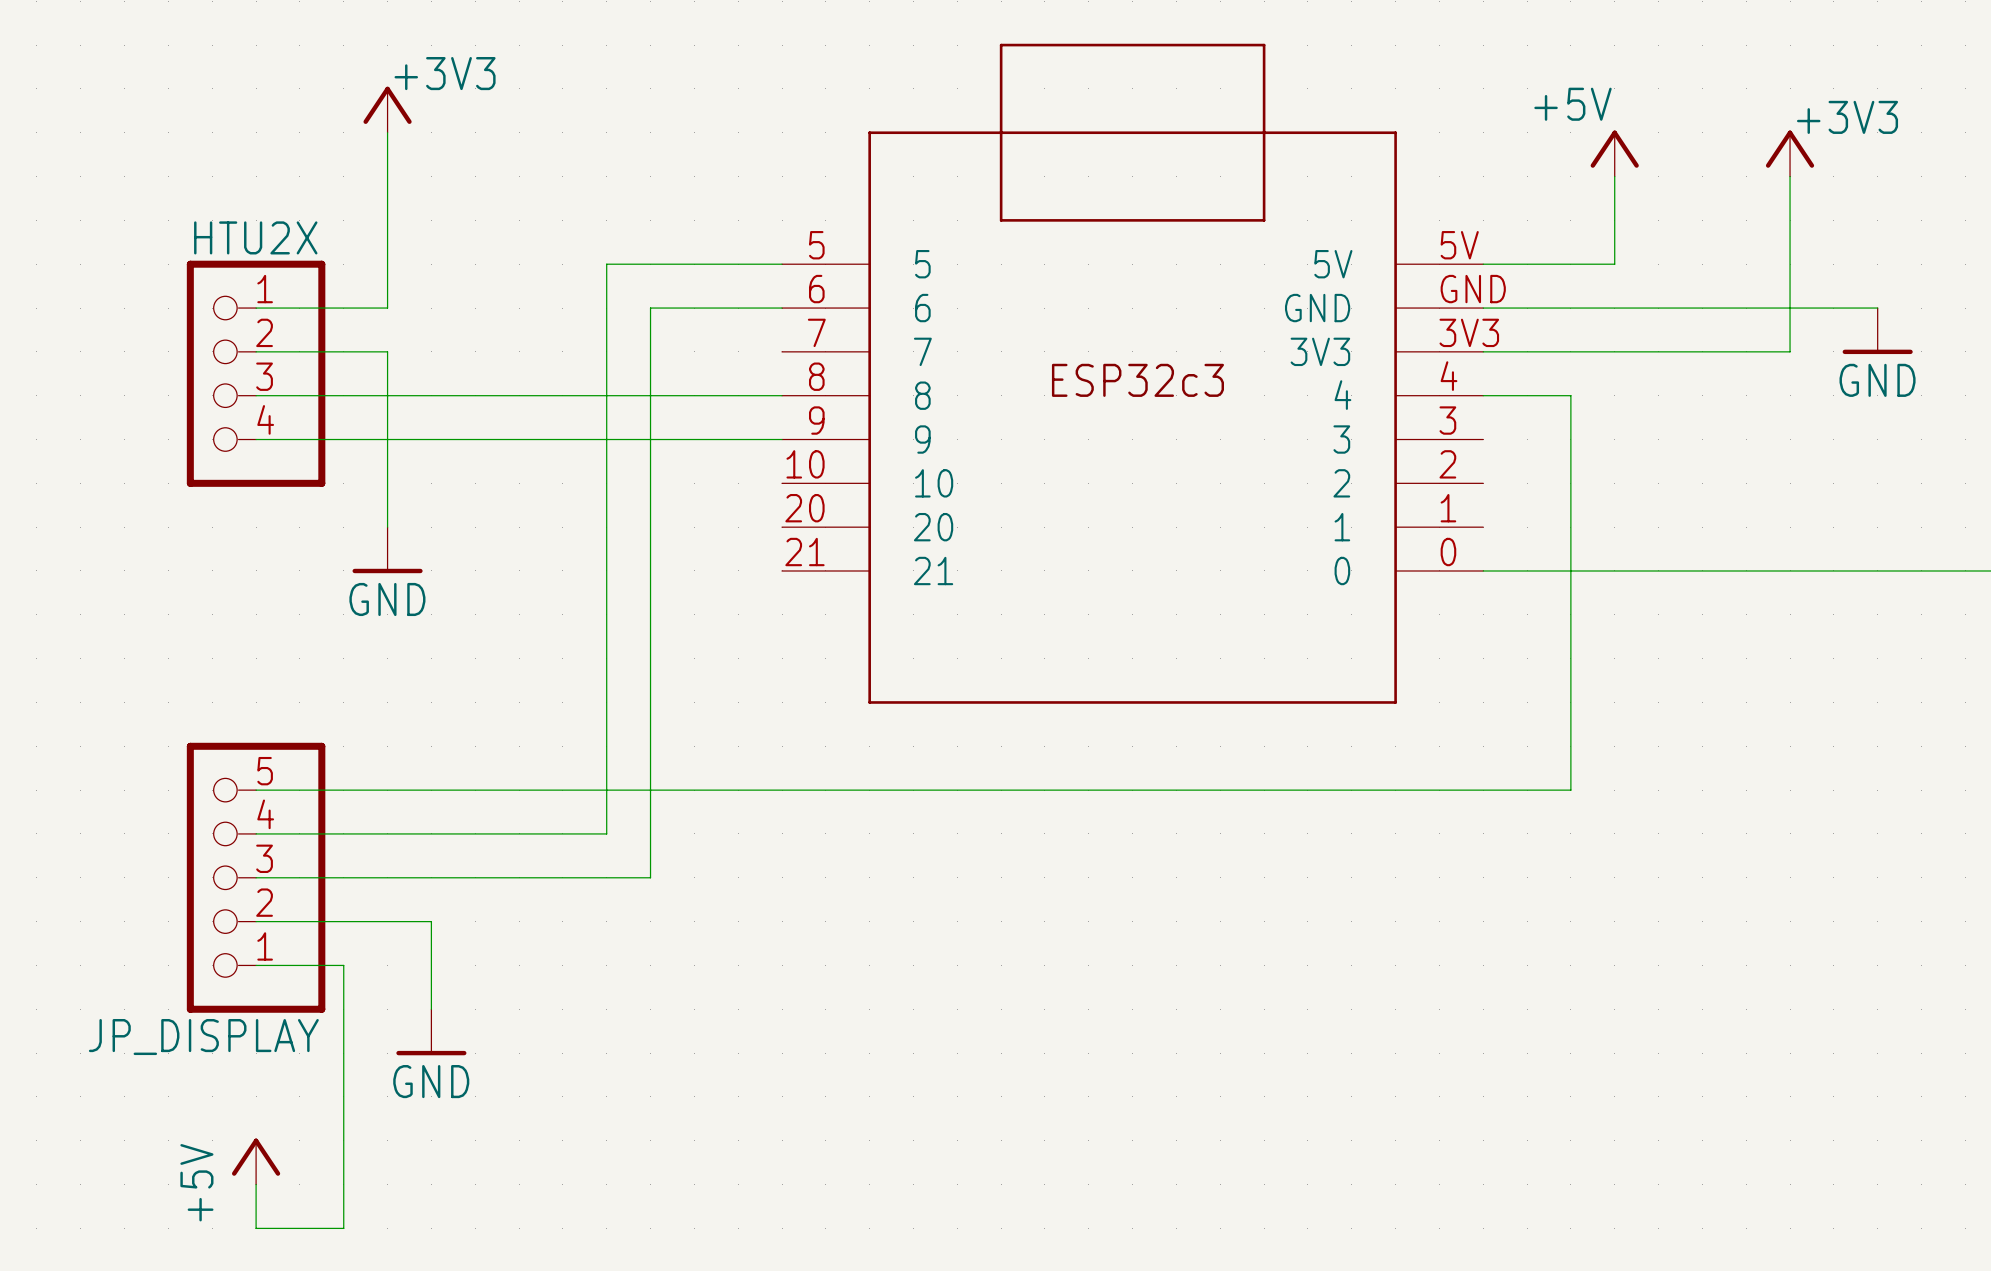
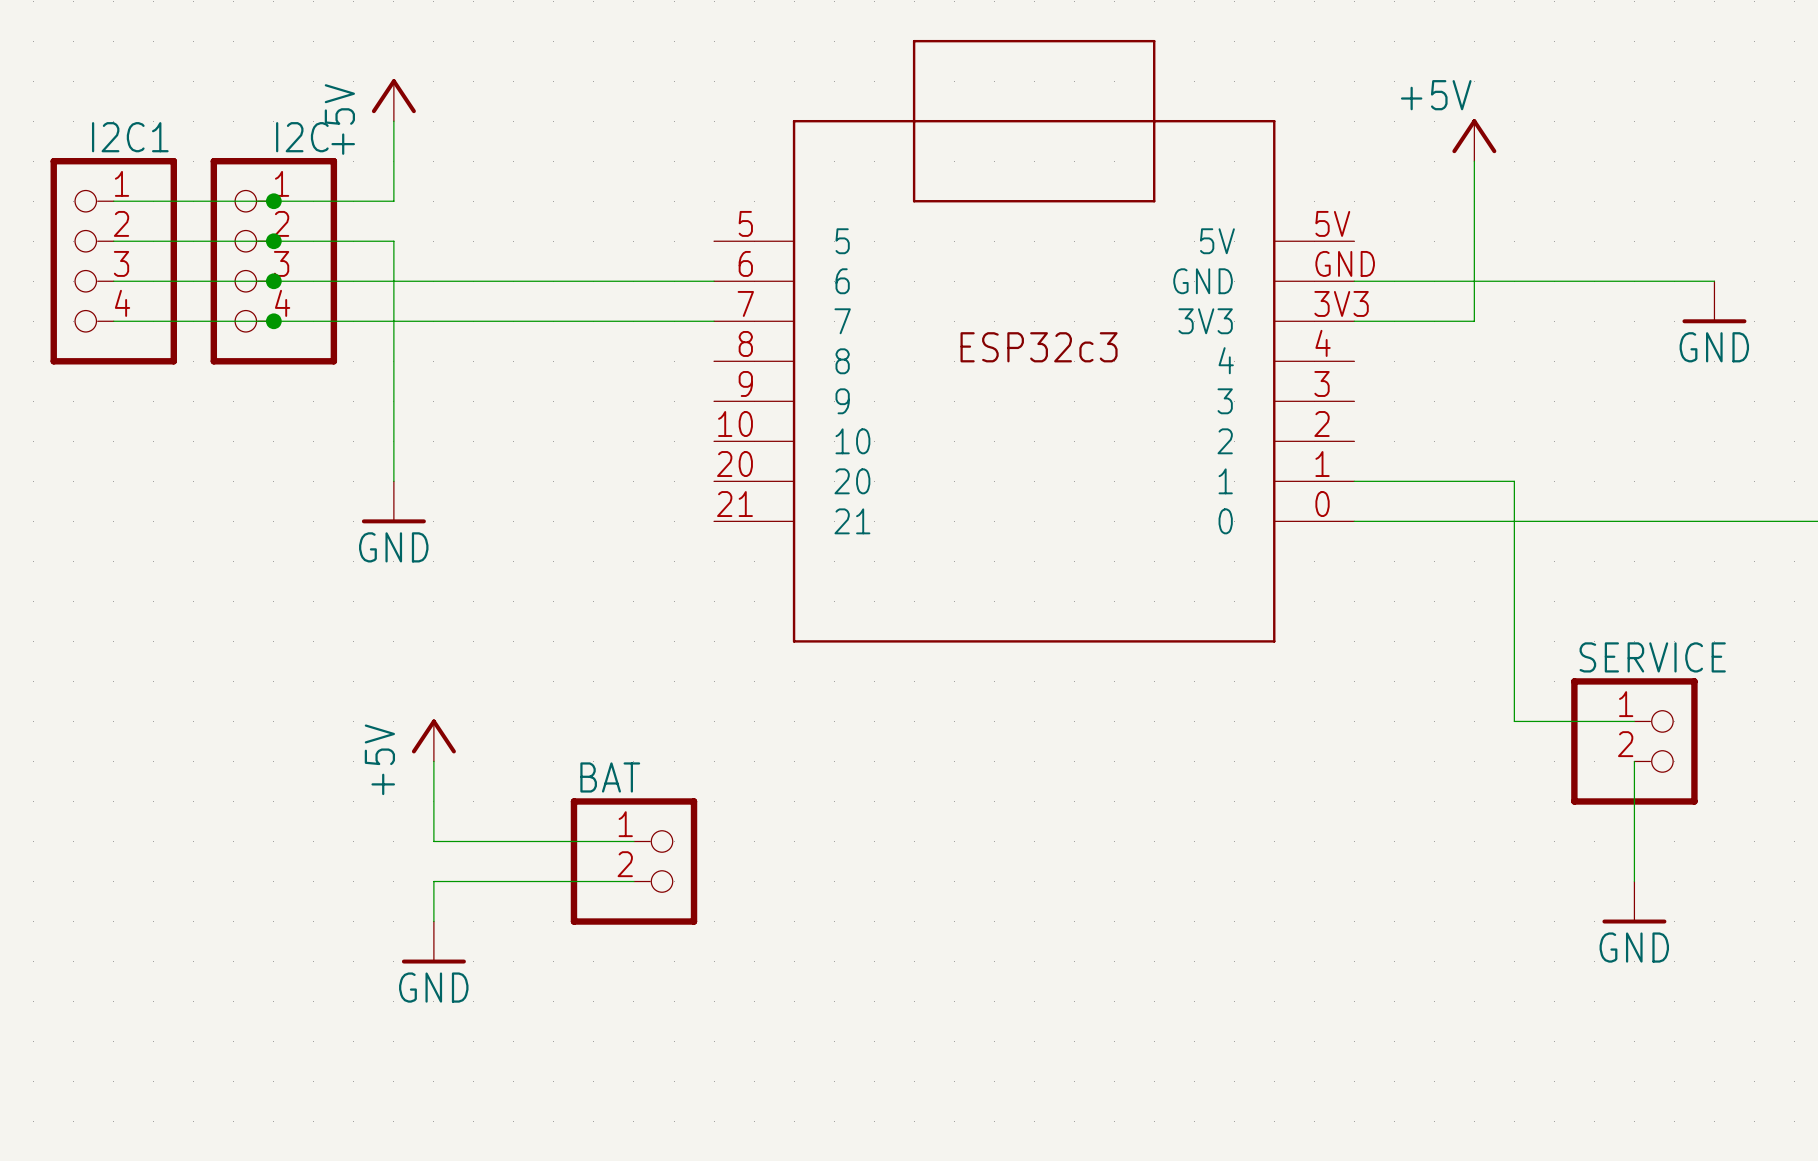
power symbol: +3V3 (387, 109) -> none
power symbol: none -> +5V (393, 100)
wire: (387, 132) (387, 308) -> (593, 281) (353, 281)
wire: none -> (393, 121) (393, 201) (113, 201)
power symbol: +3V3 (1790, 153) -> none
wire: (1790, 176) (1790, 351) (1614, 351) -> none
junction: none -> (273, 201)
wire: none -> (113, 241) (393, 241) (393, 481)
junction: none -> (273, 241)
wire: (782, 264) (606, 264) (606, 833) (256, 833) -> none
wire: (1483, 264) (1614, 264) -> (1474, 321) (1474, 241)
I2C1: none -> (113, 261)
I2C: none -> (273, 261)
wire: none -> (113, 281) (233, 281)
junction: none -> (273, 281)
wire: (650, 308) (650, 877) (256, 877) -> none
wire: none -> (113, 321) (233, 321)
junction: none -> (273, 321)
wire: (387, 351) (387, 527) -> (353, 321) (714, 321)
HTU2X: (256, 373) -> none
wire: (256, 395) (782, 395) -> none
wire: (1483, 395) (1570, 395) (1570, 790) (256, 790) -> none
wire: (256, 439) (782, 439) -> none
wire: none -> (1354, 481) (1514, 481) (1514, 721) (1634, 721)
power symbol position: GND (387, 550) -> GND (393, 502)
SERVICE: none -> (1634, 741)
wire: none -> (433, 761) (433, 841) (633, 841)
wire: none -> (1634, 761) (1634, 881)
JP_DISPLAY: (256, 877) -> none
wire: (256, 921) (431, 921) (431, 1009) -> none
BAT: none -> (633, 861)
wire: (256, 965) (343, 965) (343, 1228) (256, 1228) (256, 1184) -> none
wire: none -> (633, 881) (433, 881) (433, 921)
power symbol: none -> GND (1634, 902)
power symbol position: GND (431, 1032) -> GND (433, 942)
power symbol position: +5V (256, 1161) -> +5V (433, 740)

